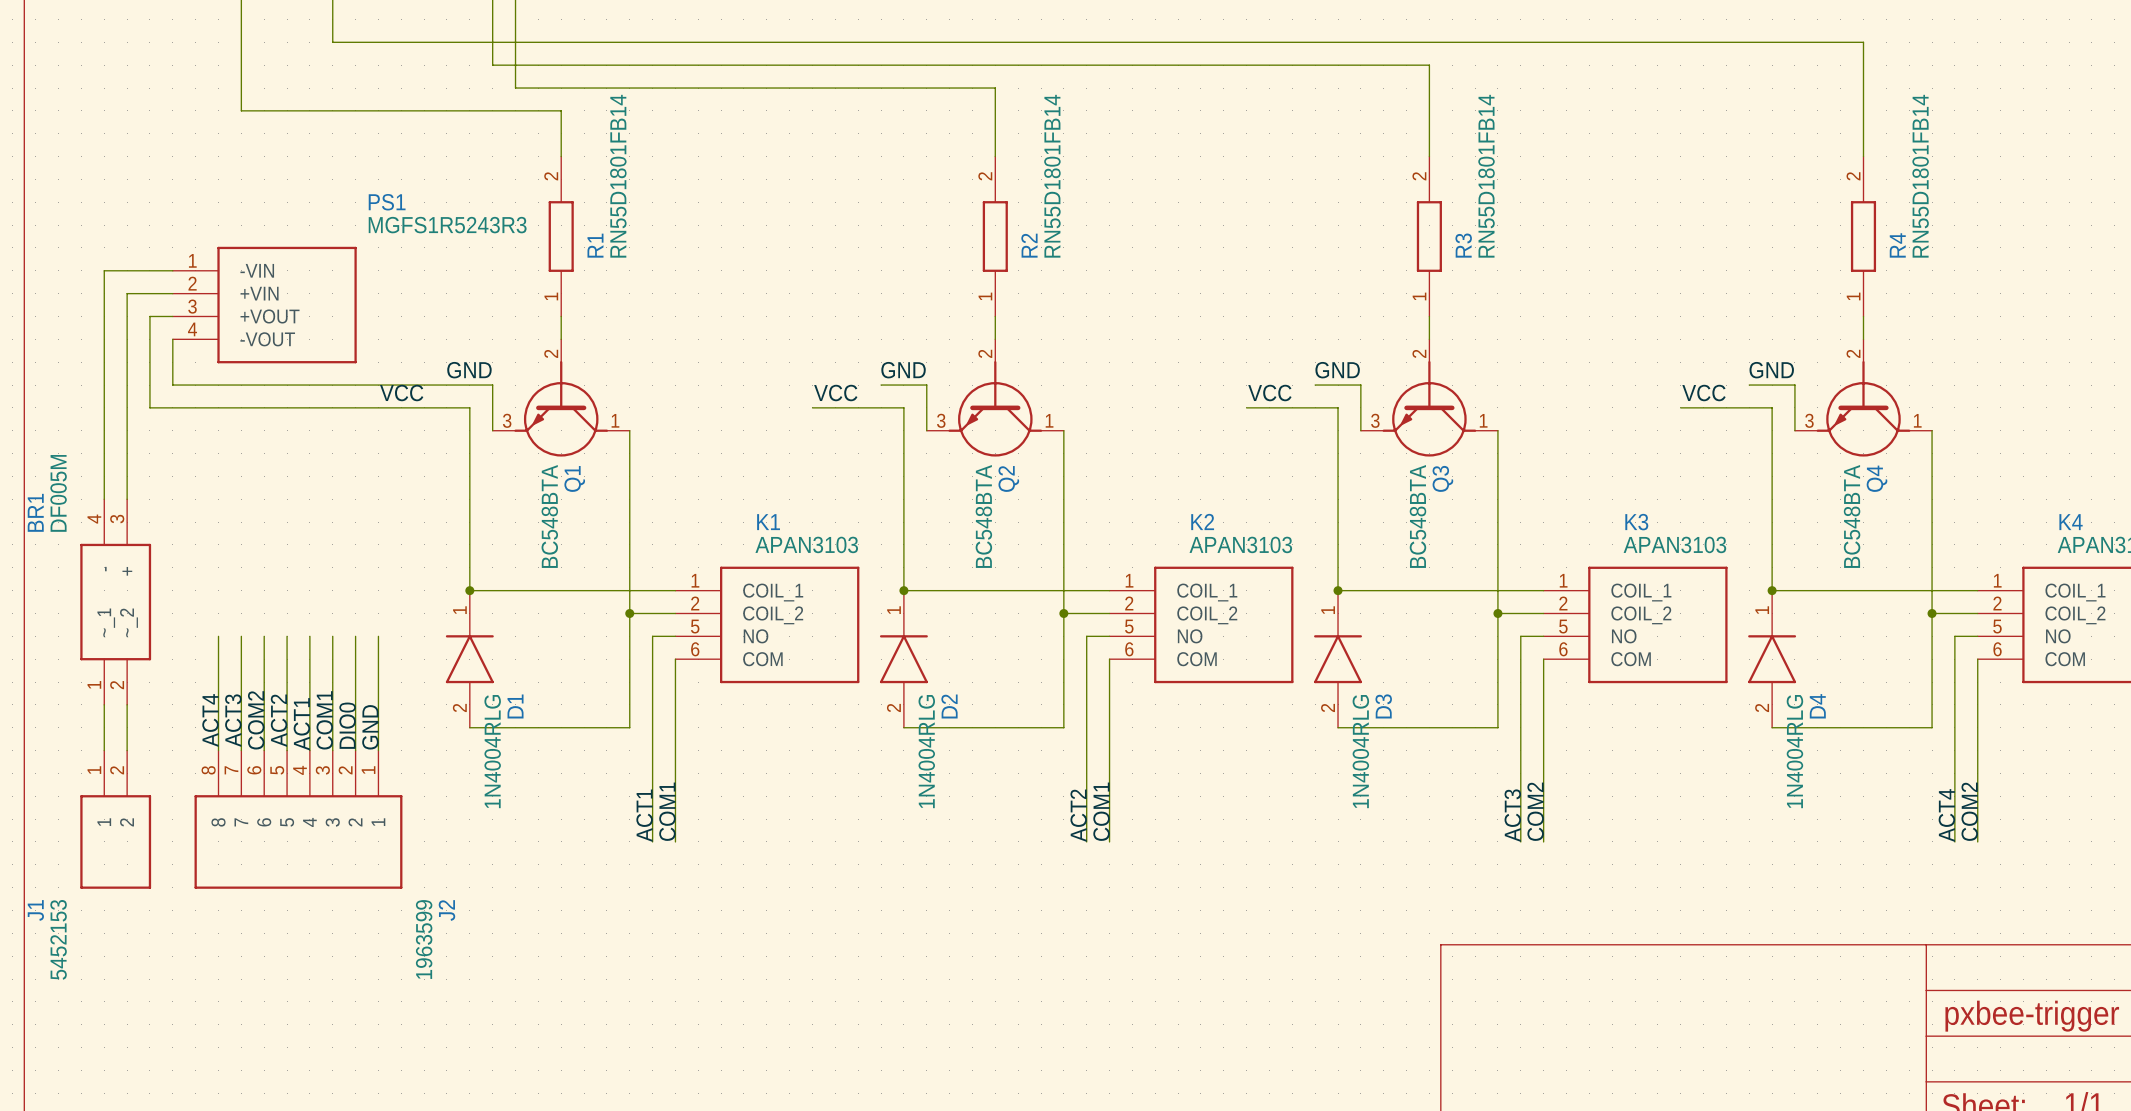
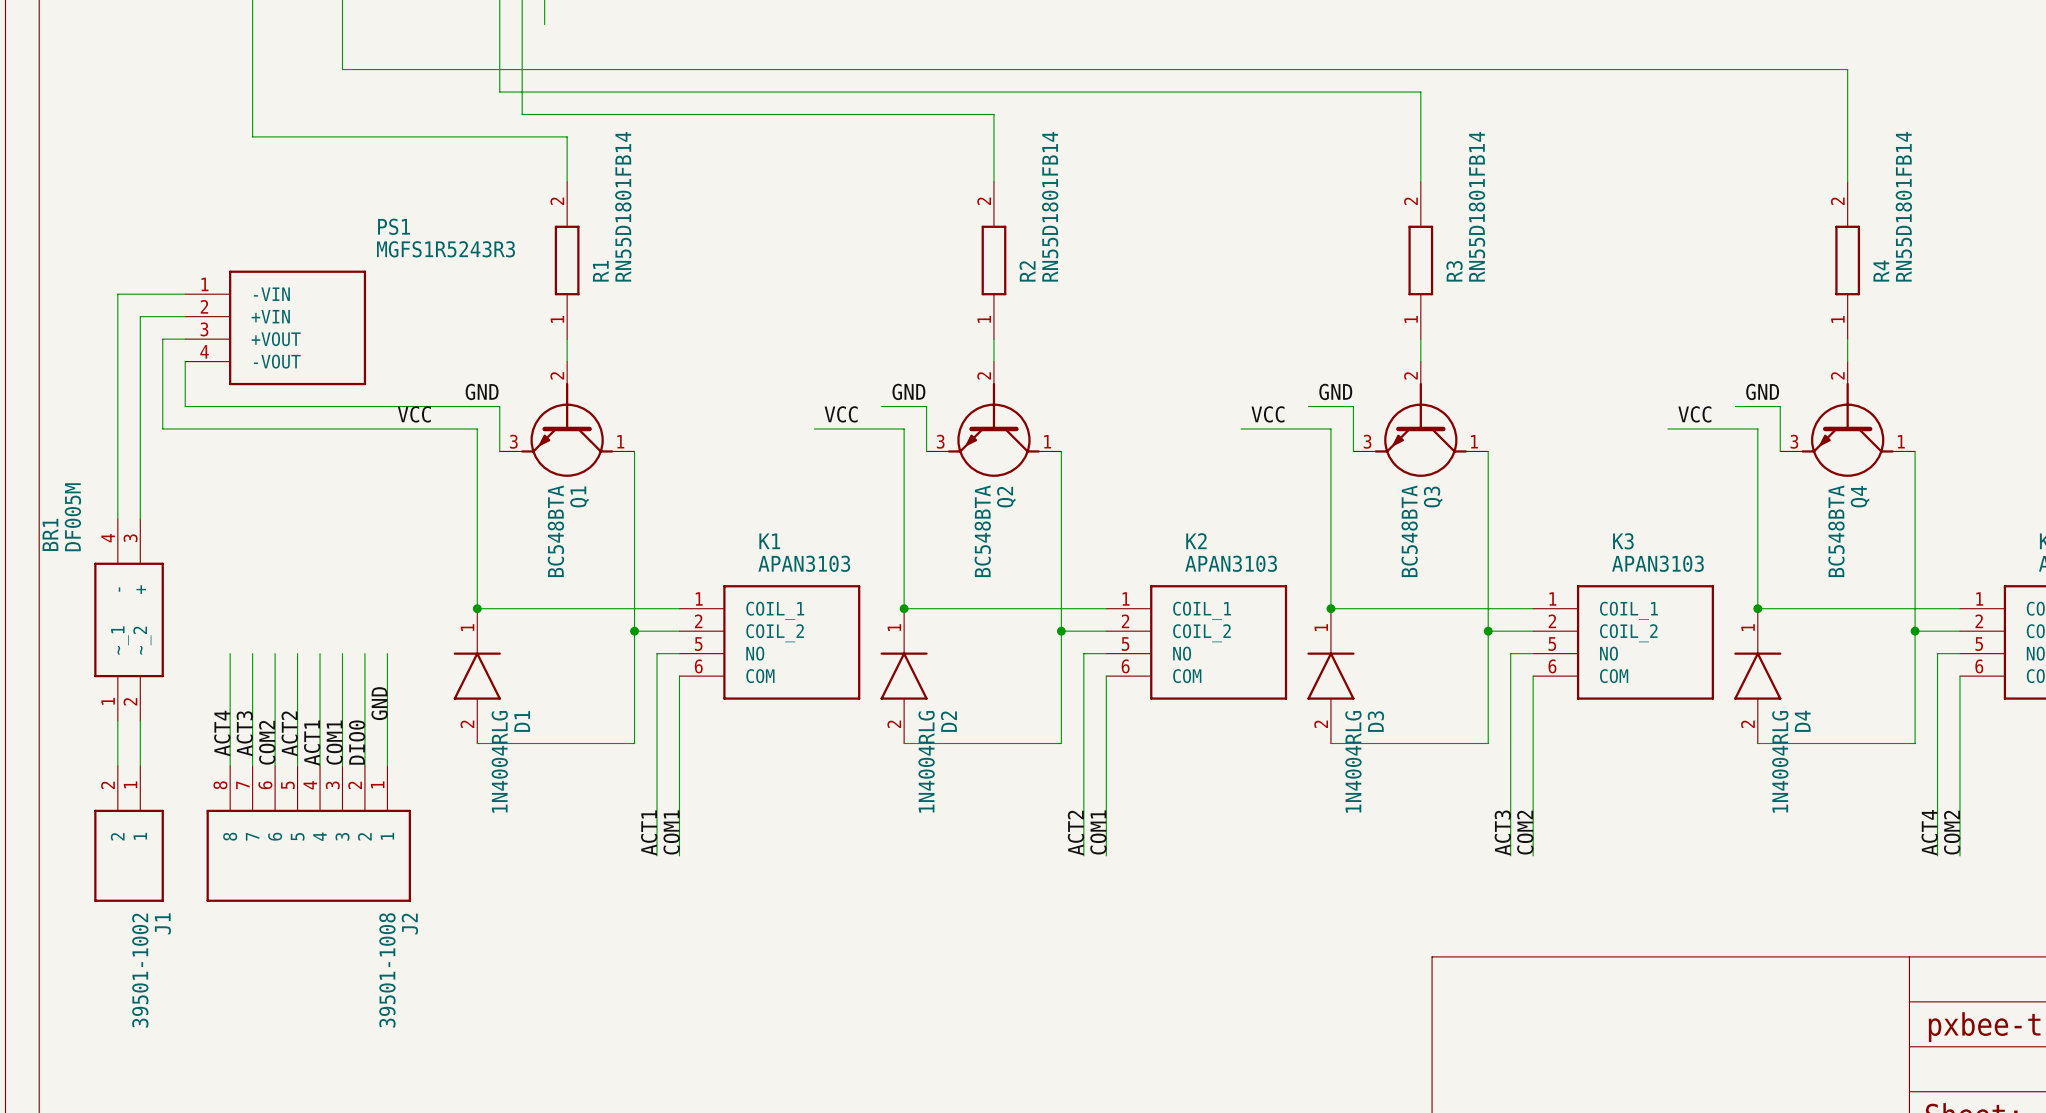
label position: GND (370, 727) -> GND (379, 703)
J1 flip: as is (115, 841) -> left-right (129, 855)
J1 name position: J1 (35, 910) -> J1 (162, 923)
J2 name position: J2 (446, 910) -> J2 (409, 923)
J1 value: 5452153 (58, 939) -> 39501-1002 (140, 970)
J2 value: 1963599 (424, 939) -> 39501-1008 (387, 970)

